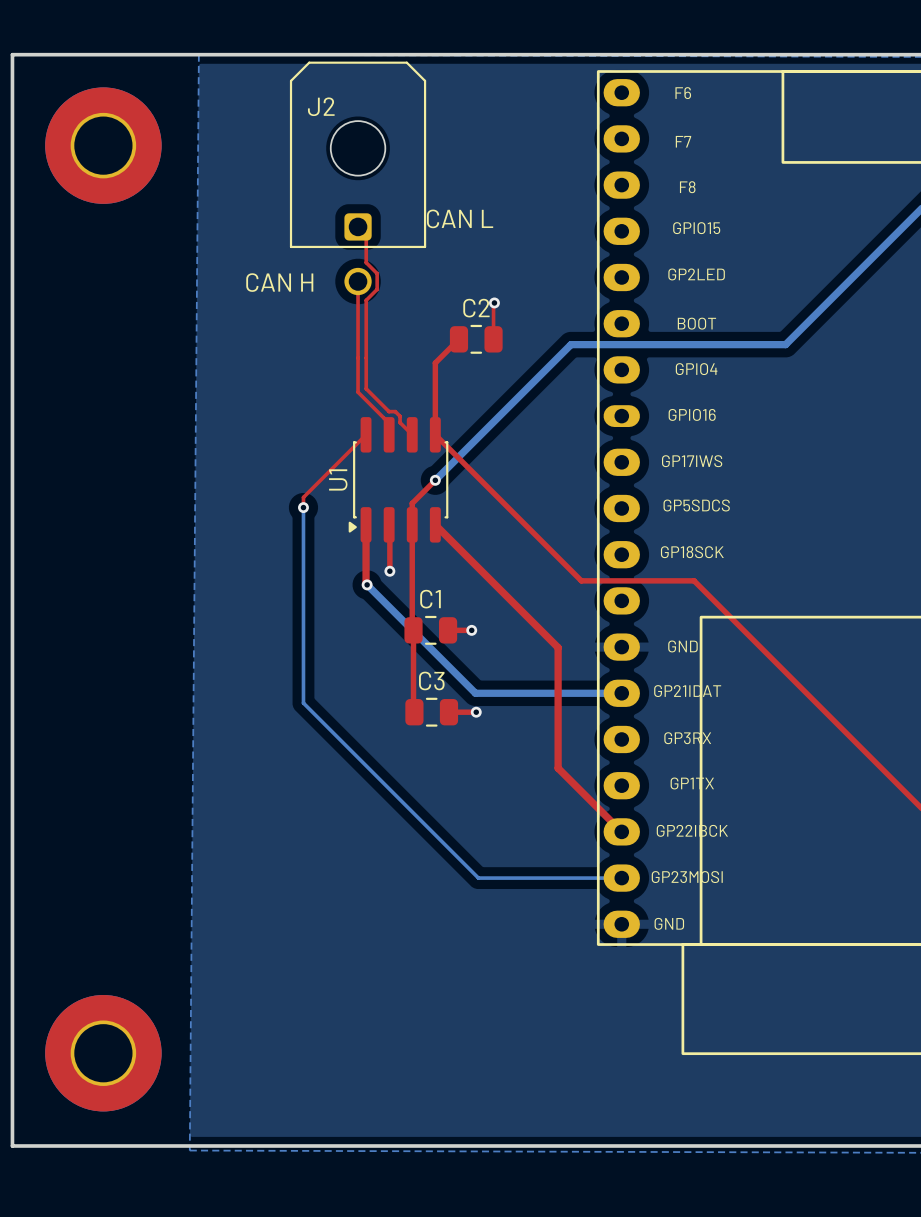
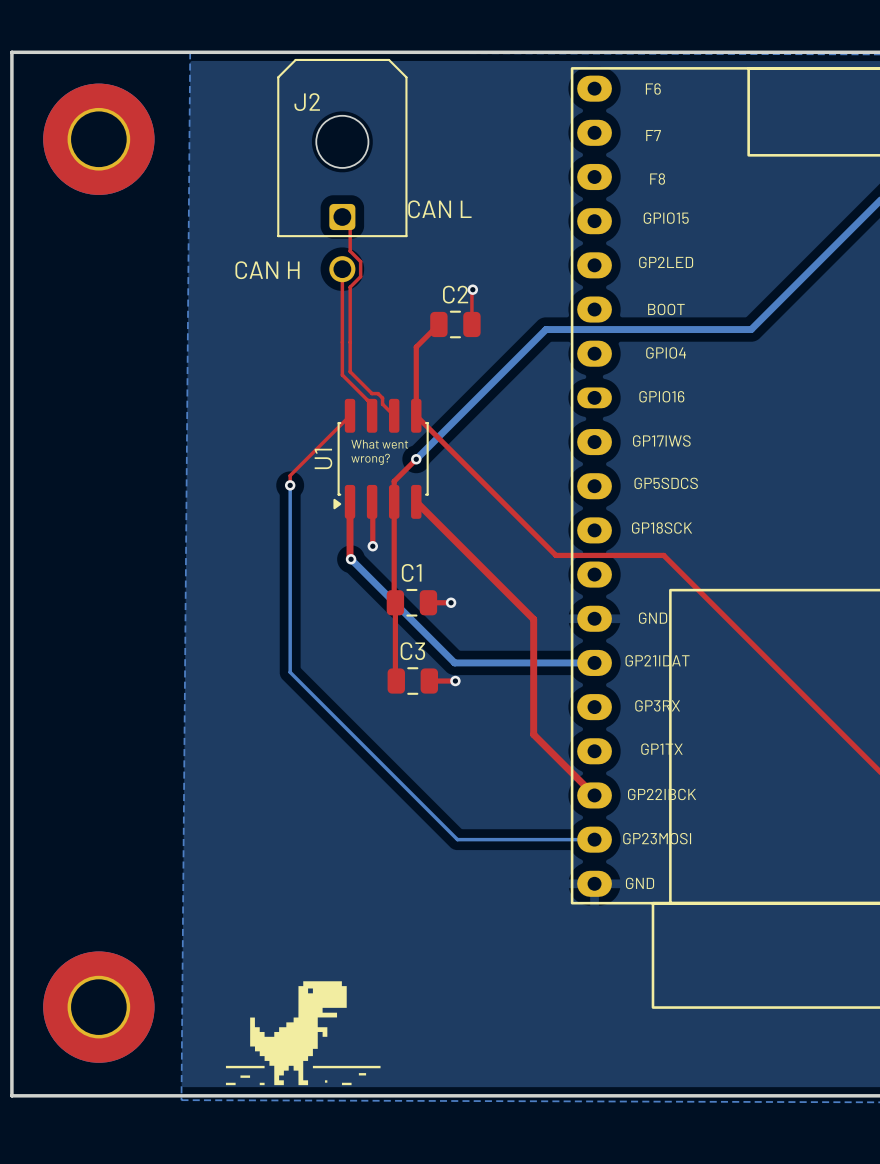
text: none -> What went (379, 444)
text: none -> wrong? (370, 459)
drawing: none -> [225, 981, 381, 1086]

